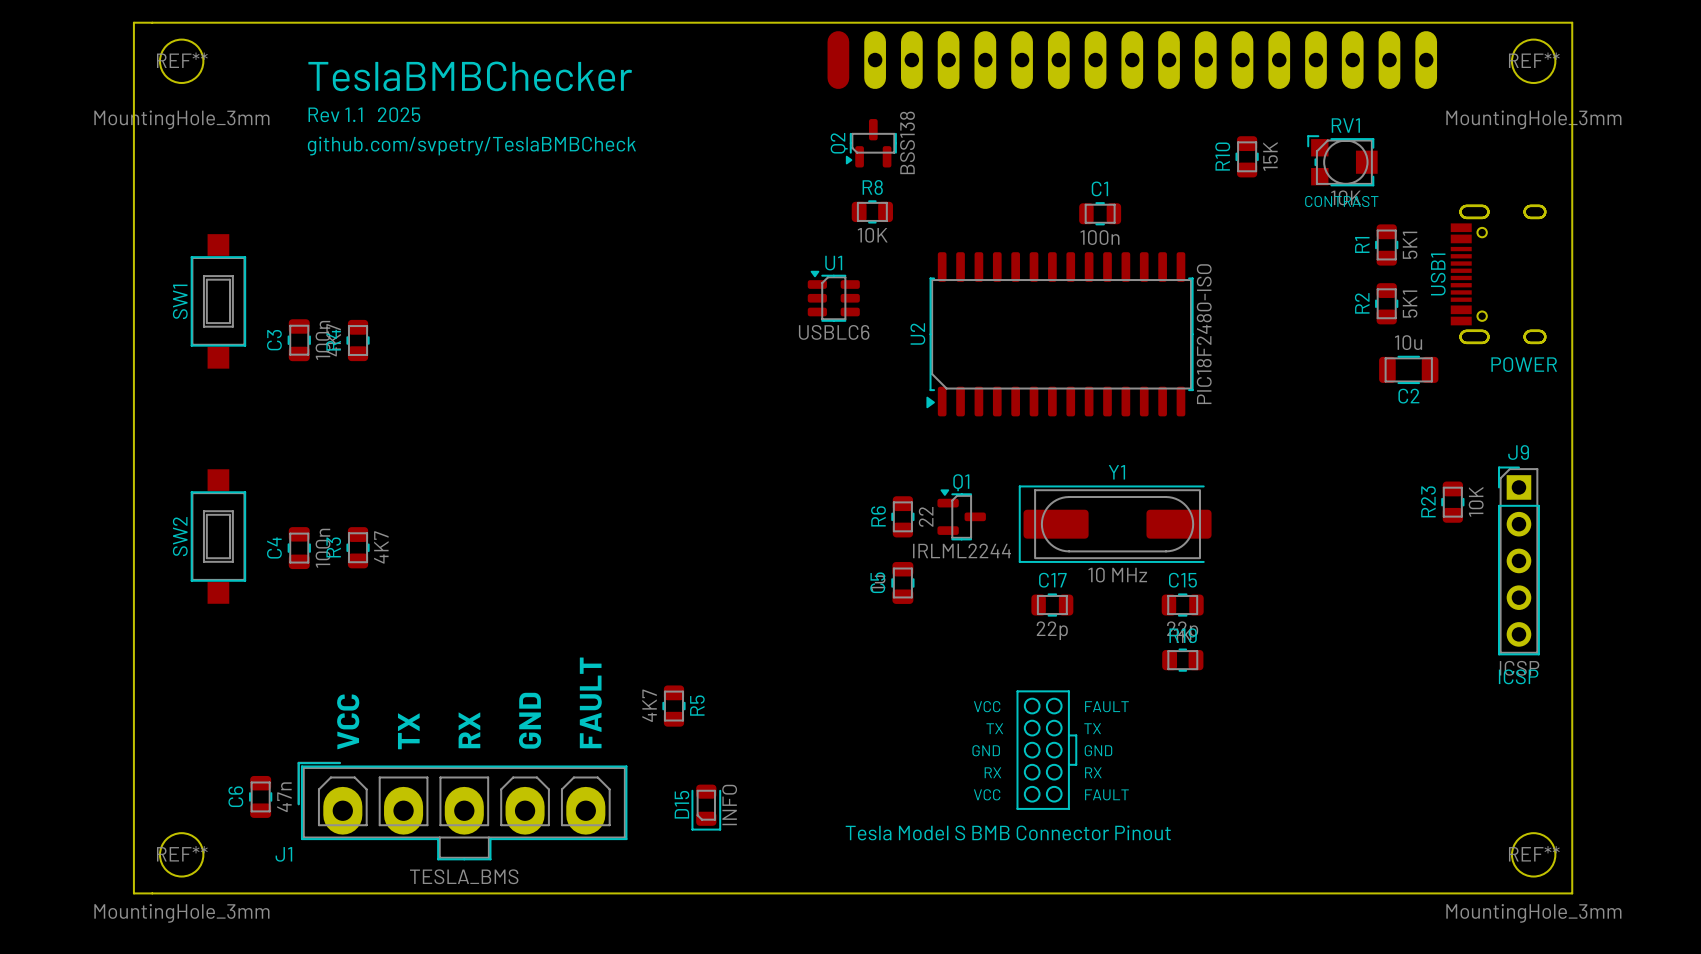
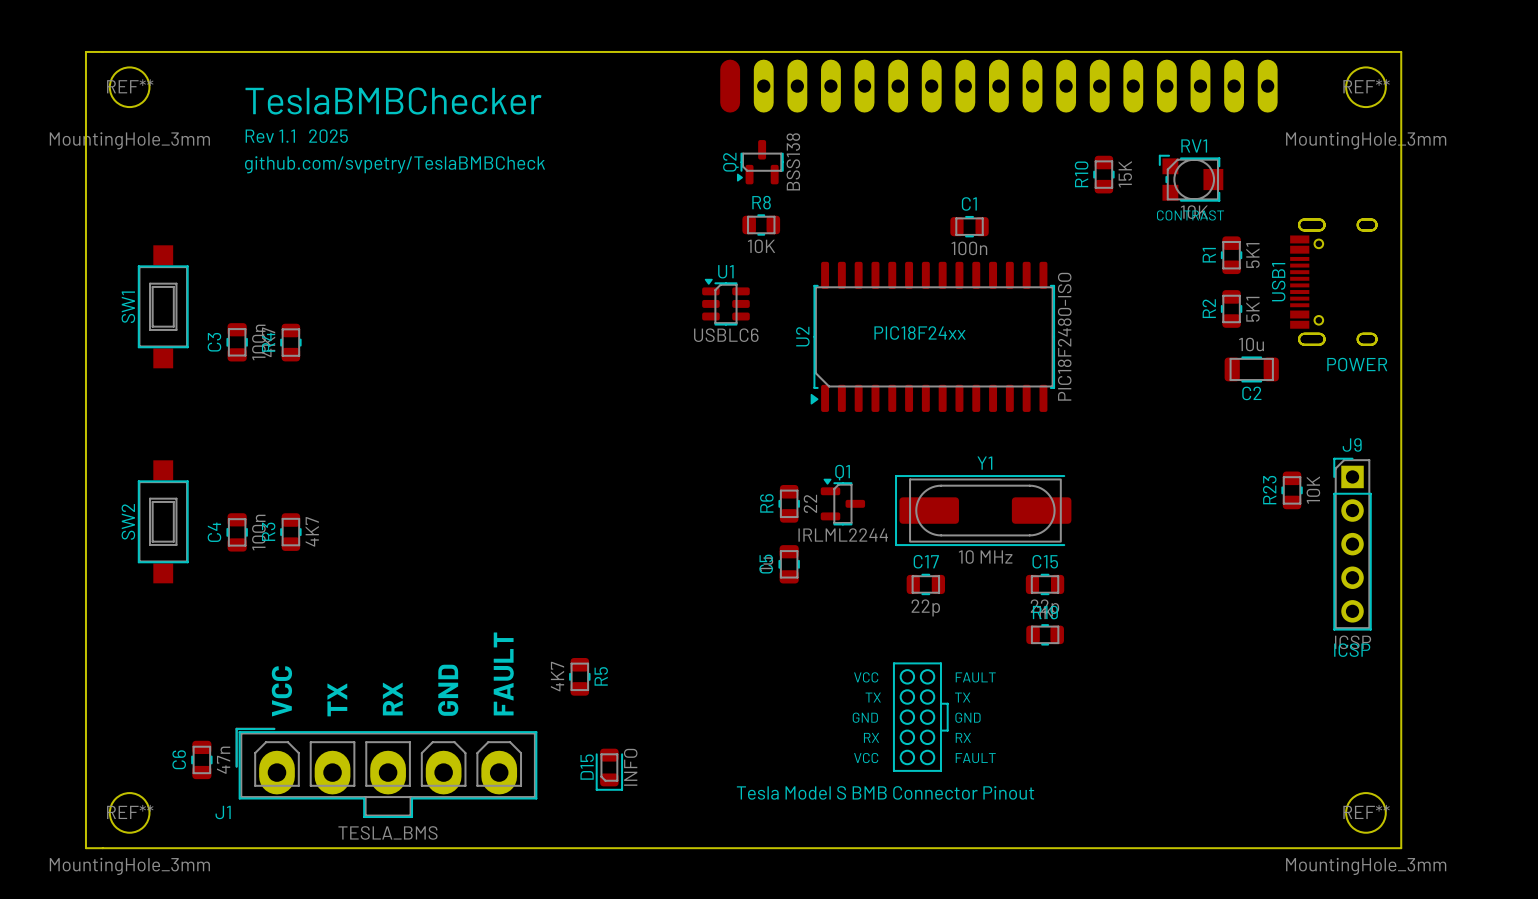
text: none -> PIC18F24xx (920, 332)

